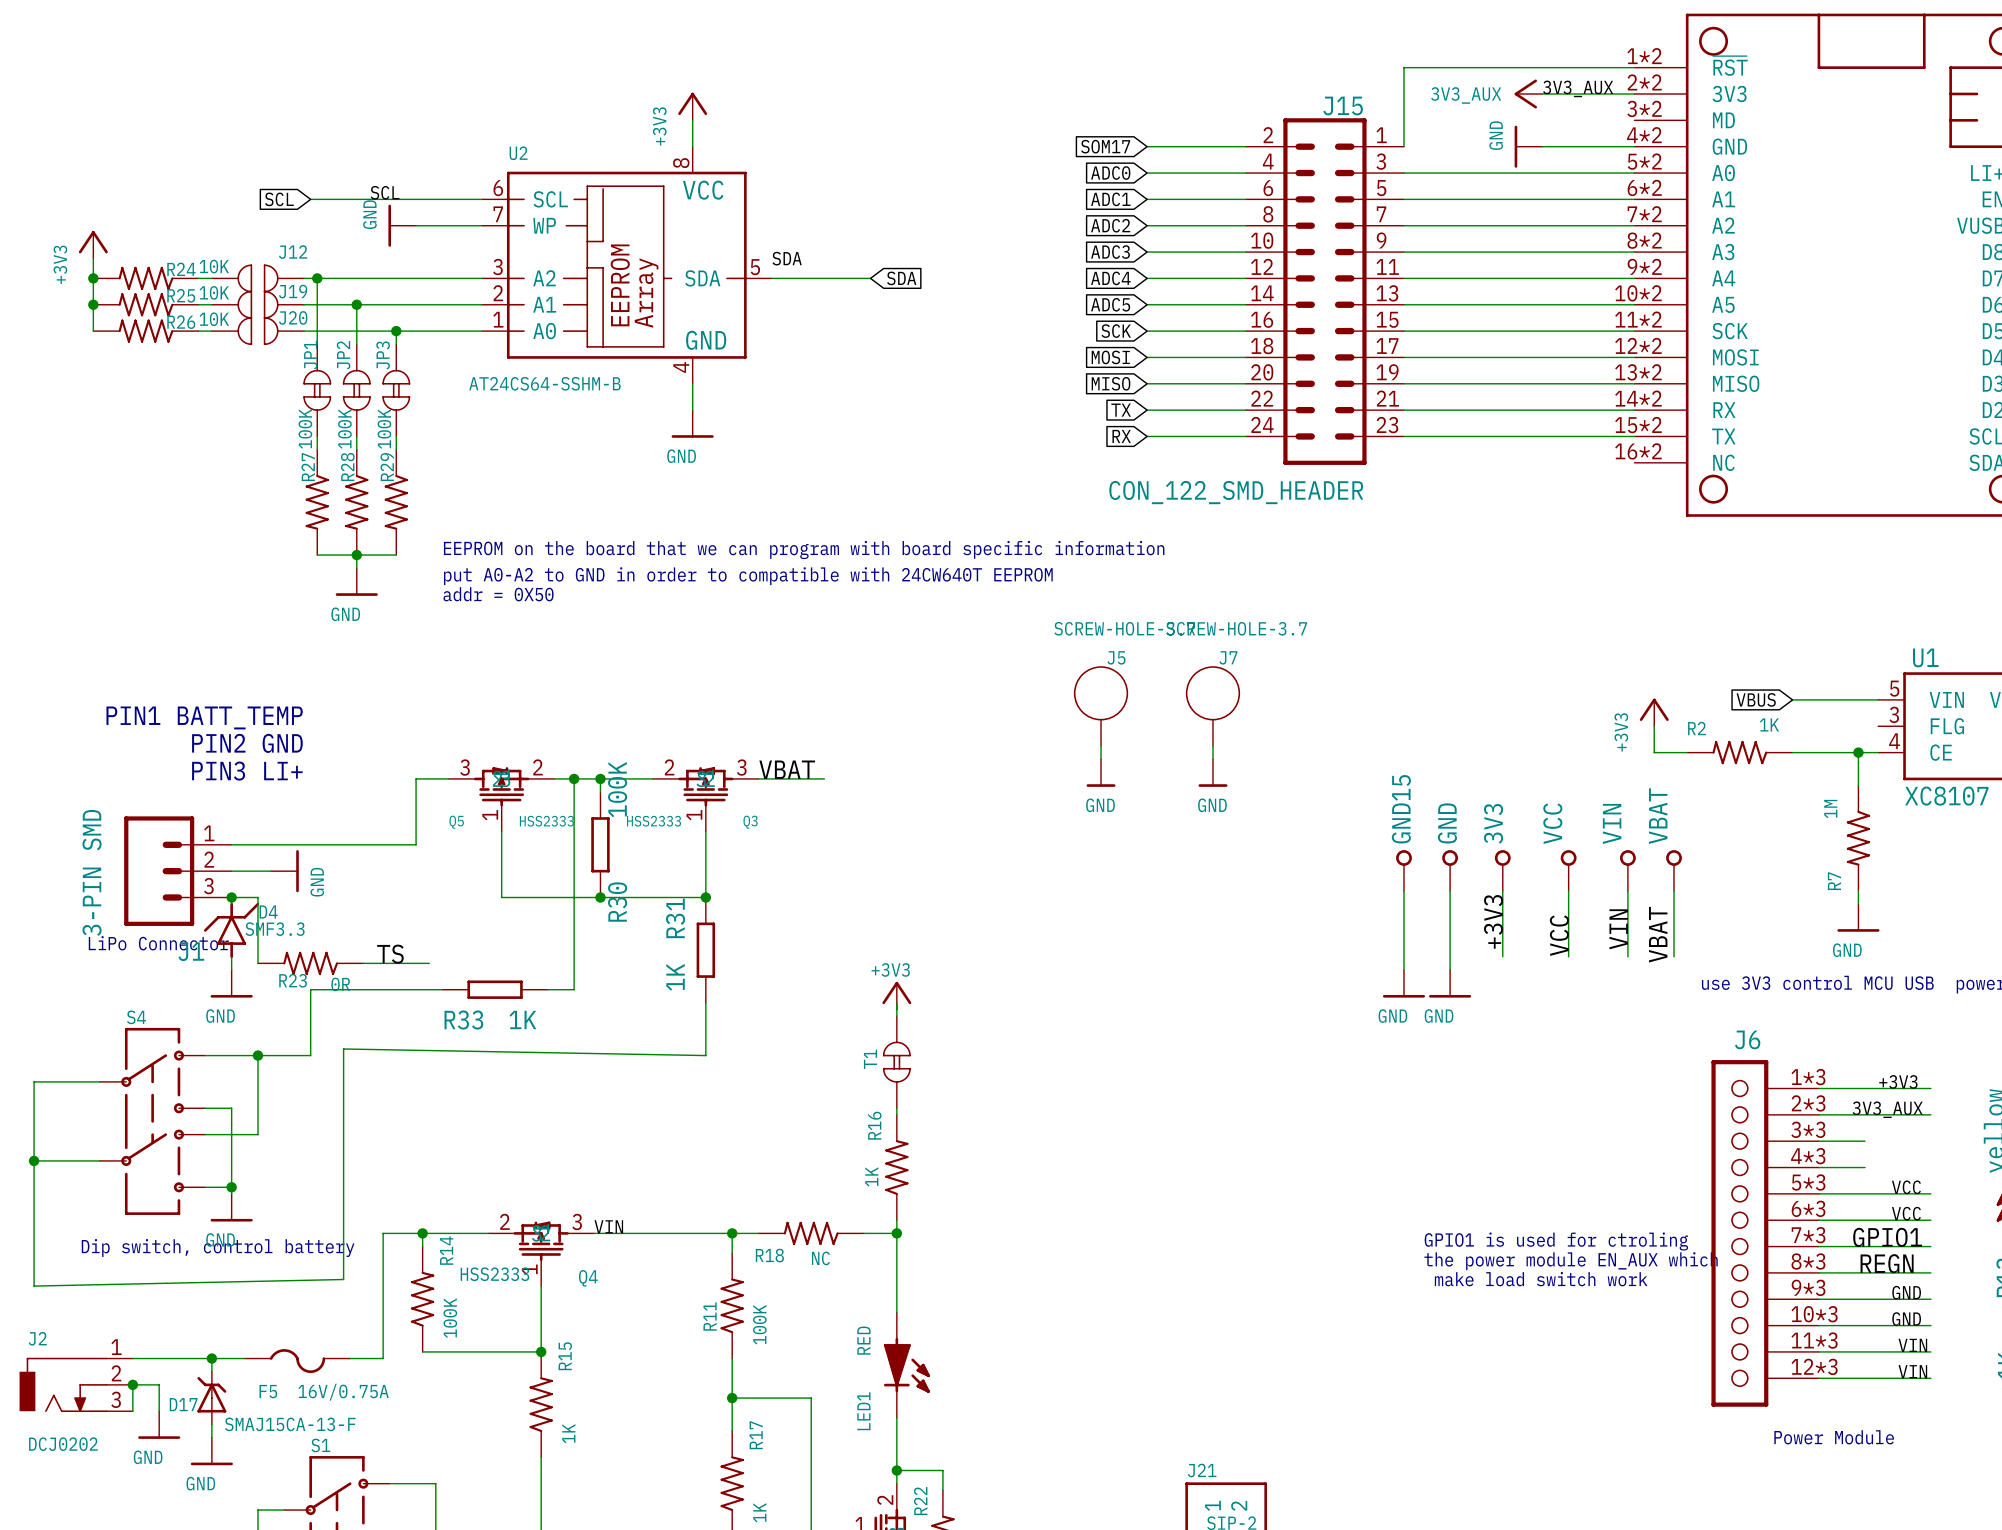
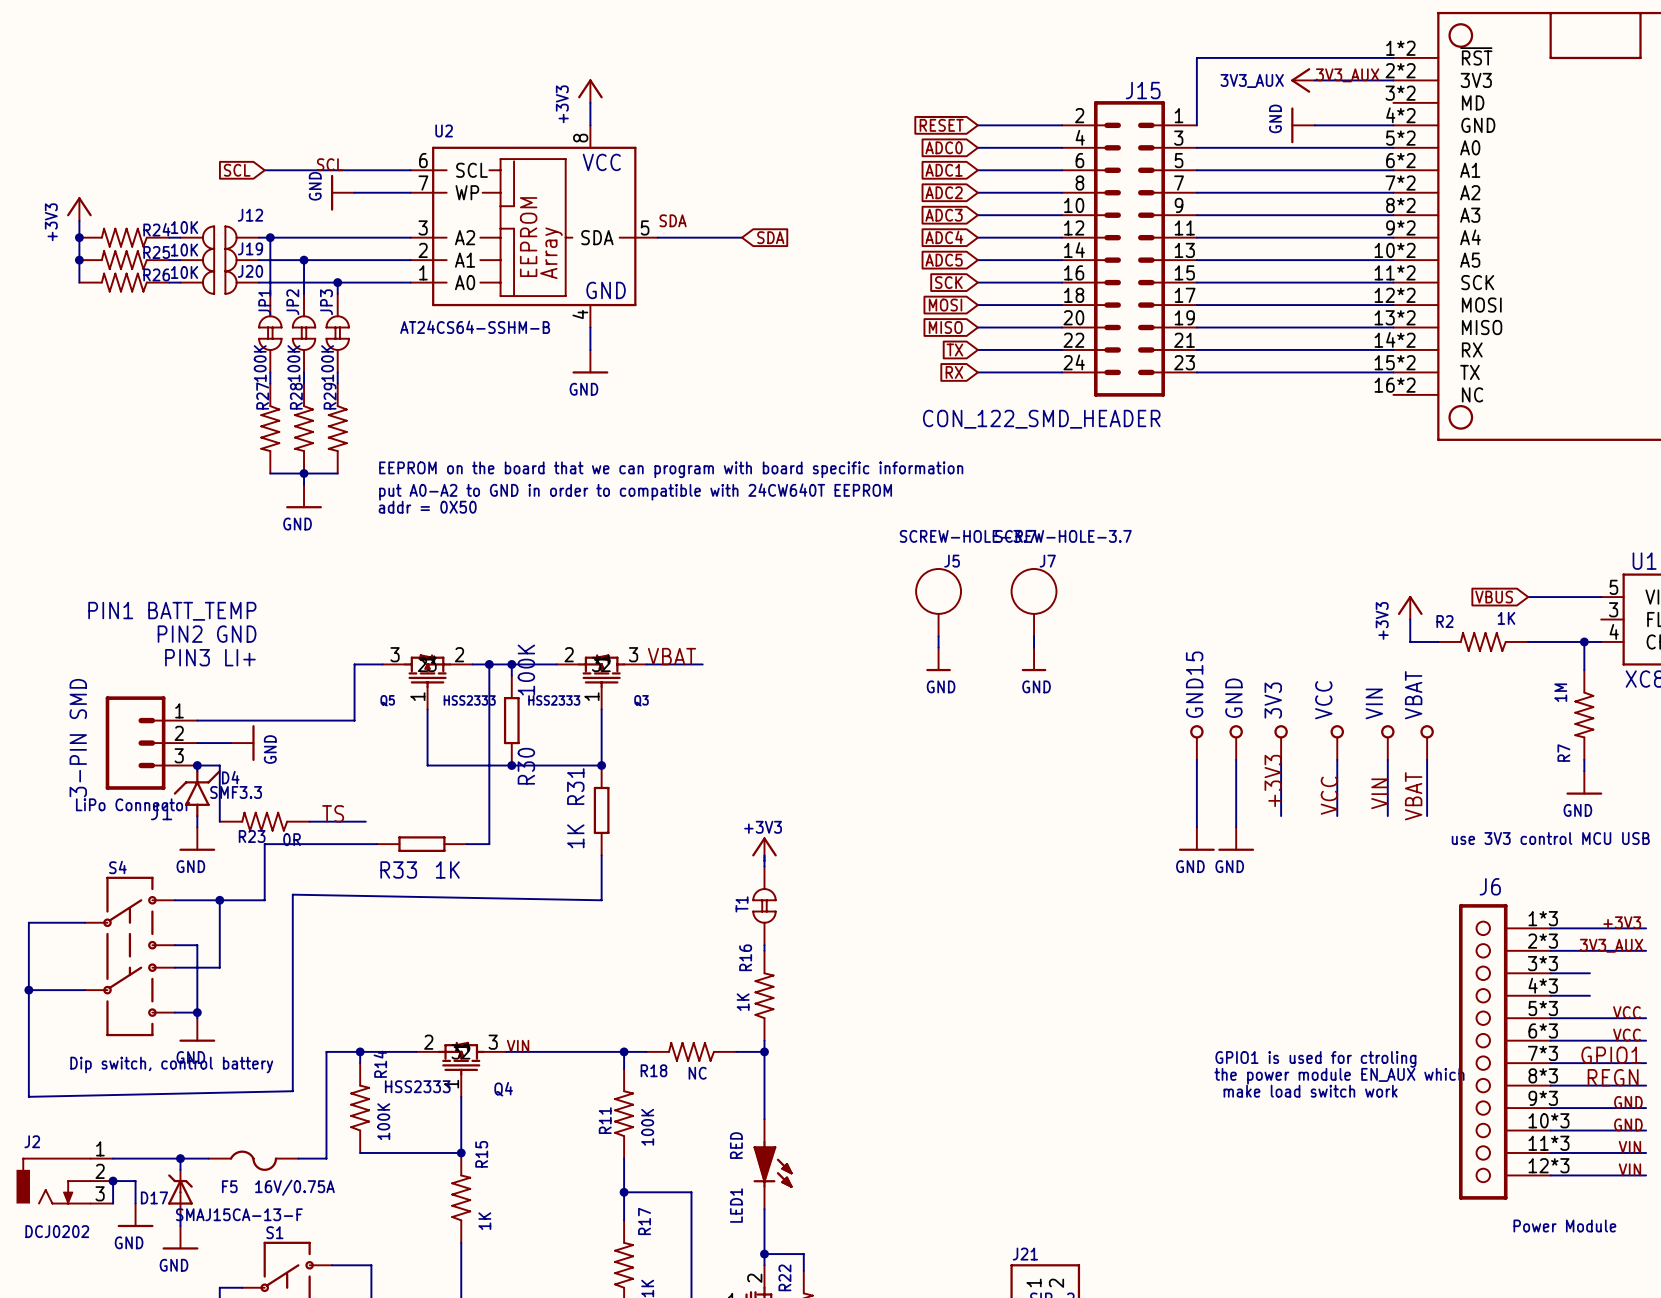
global label: SOM17 (1105, 146) -> ~{RESET} (940, 124)

